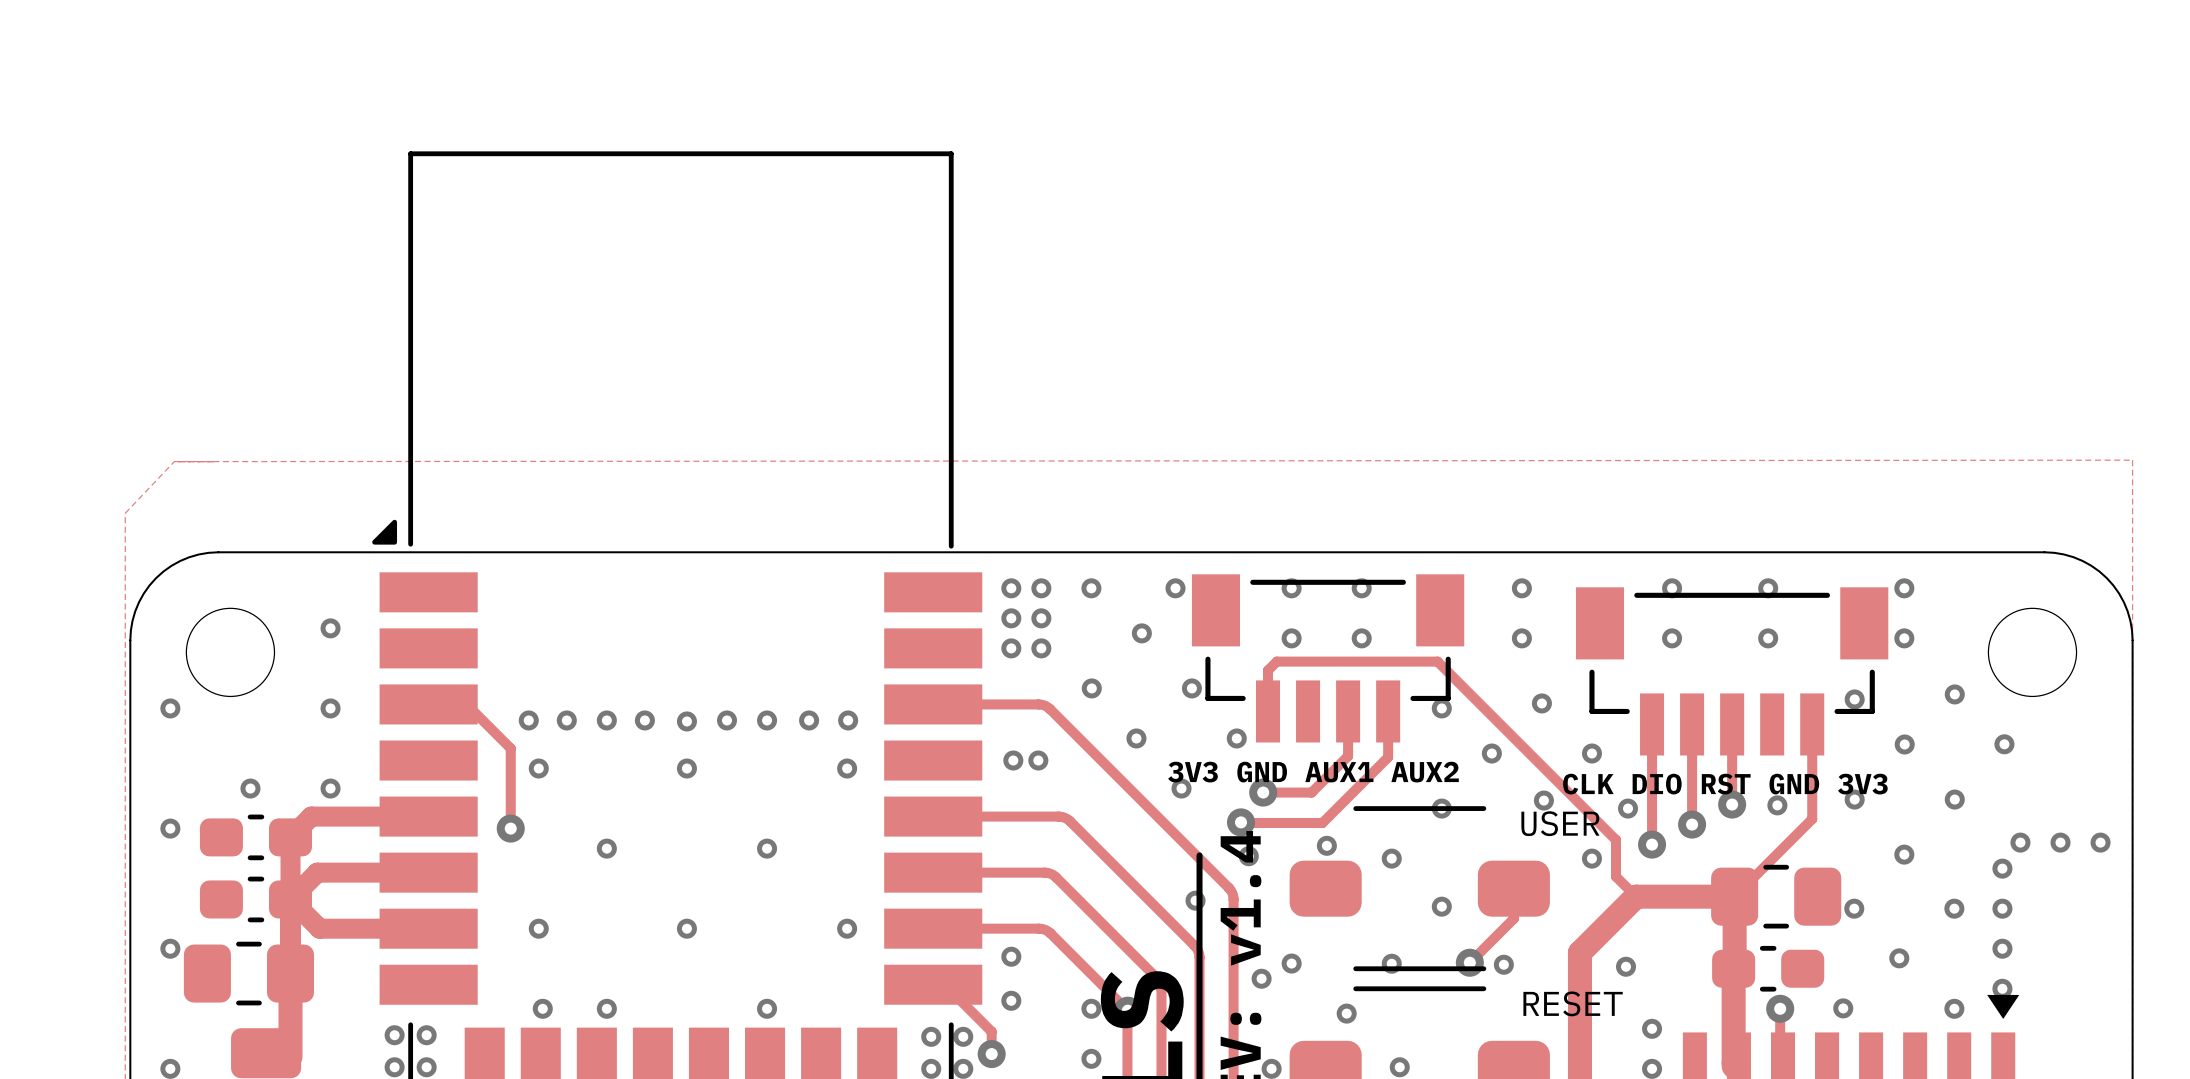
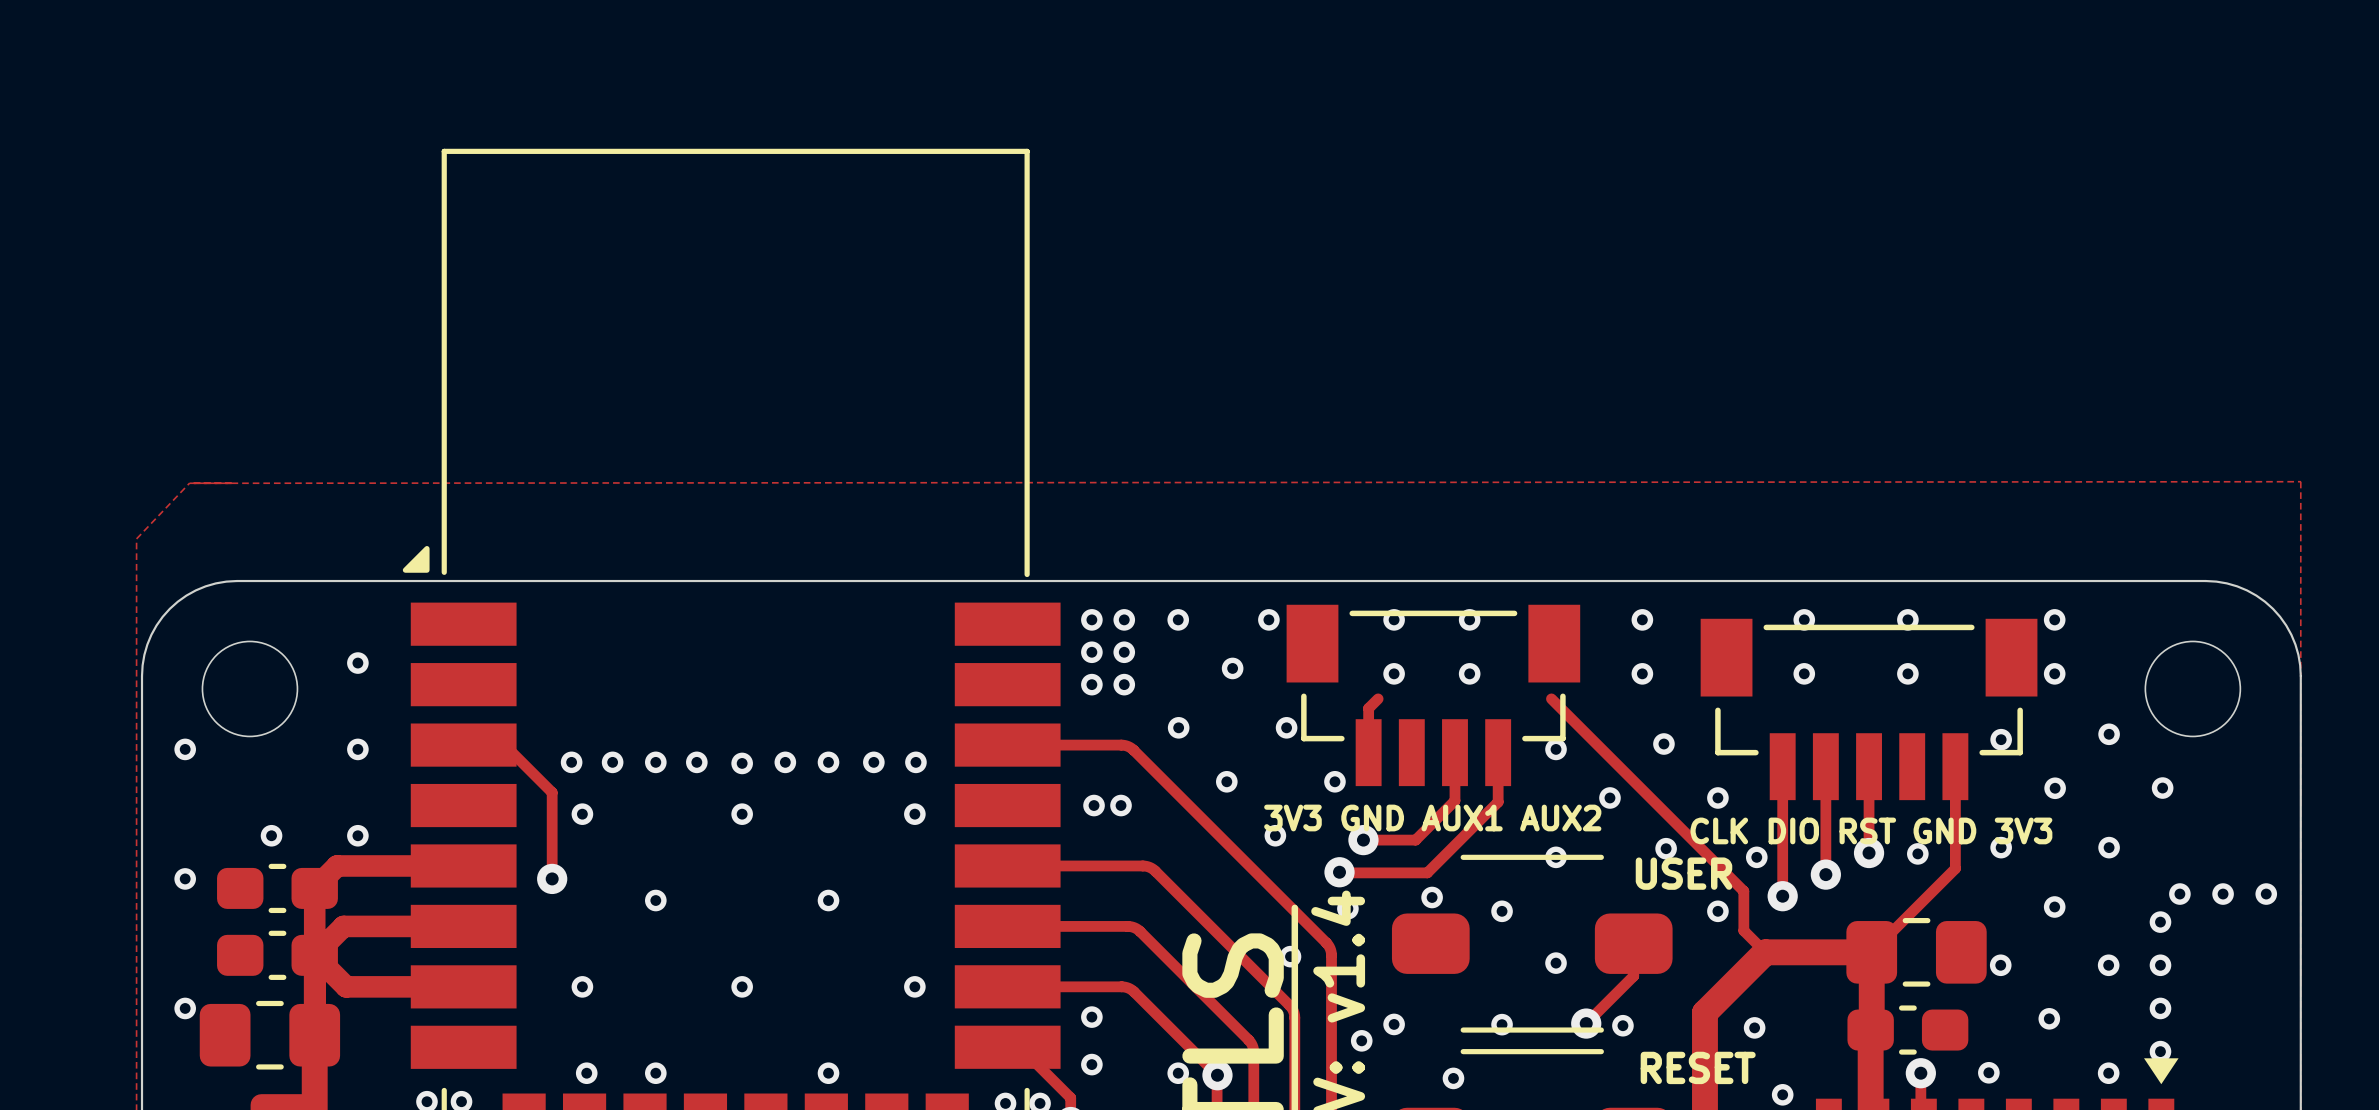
track: (1276, 661) (1437, 661) -> none

